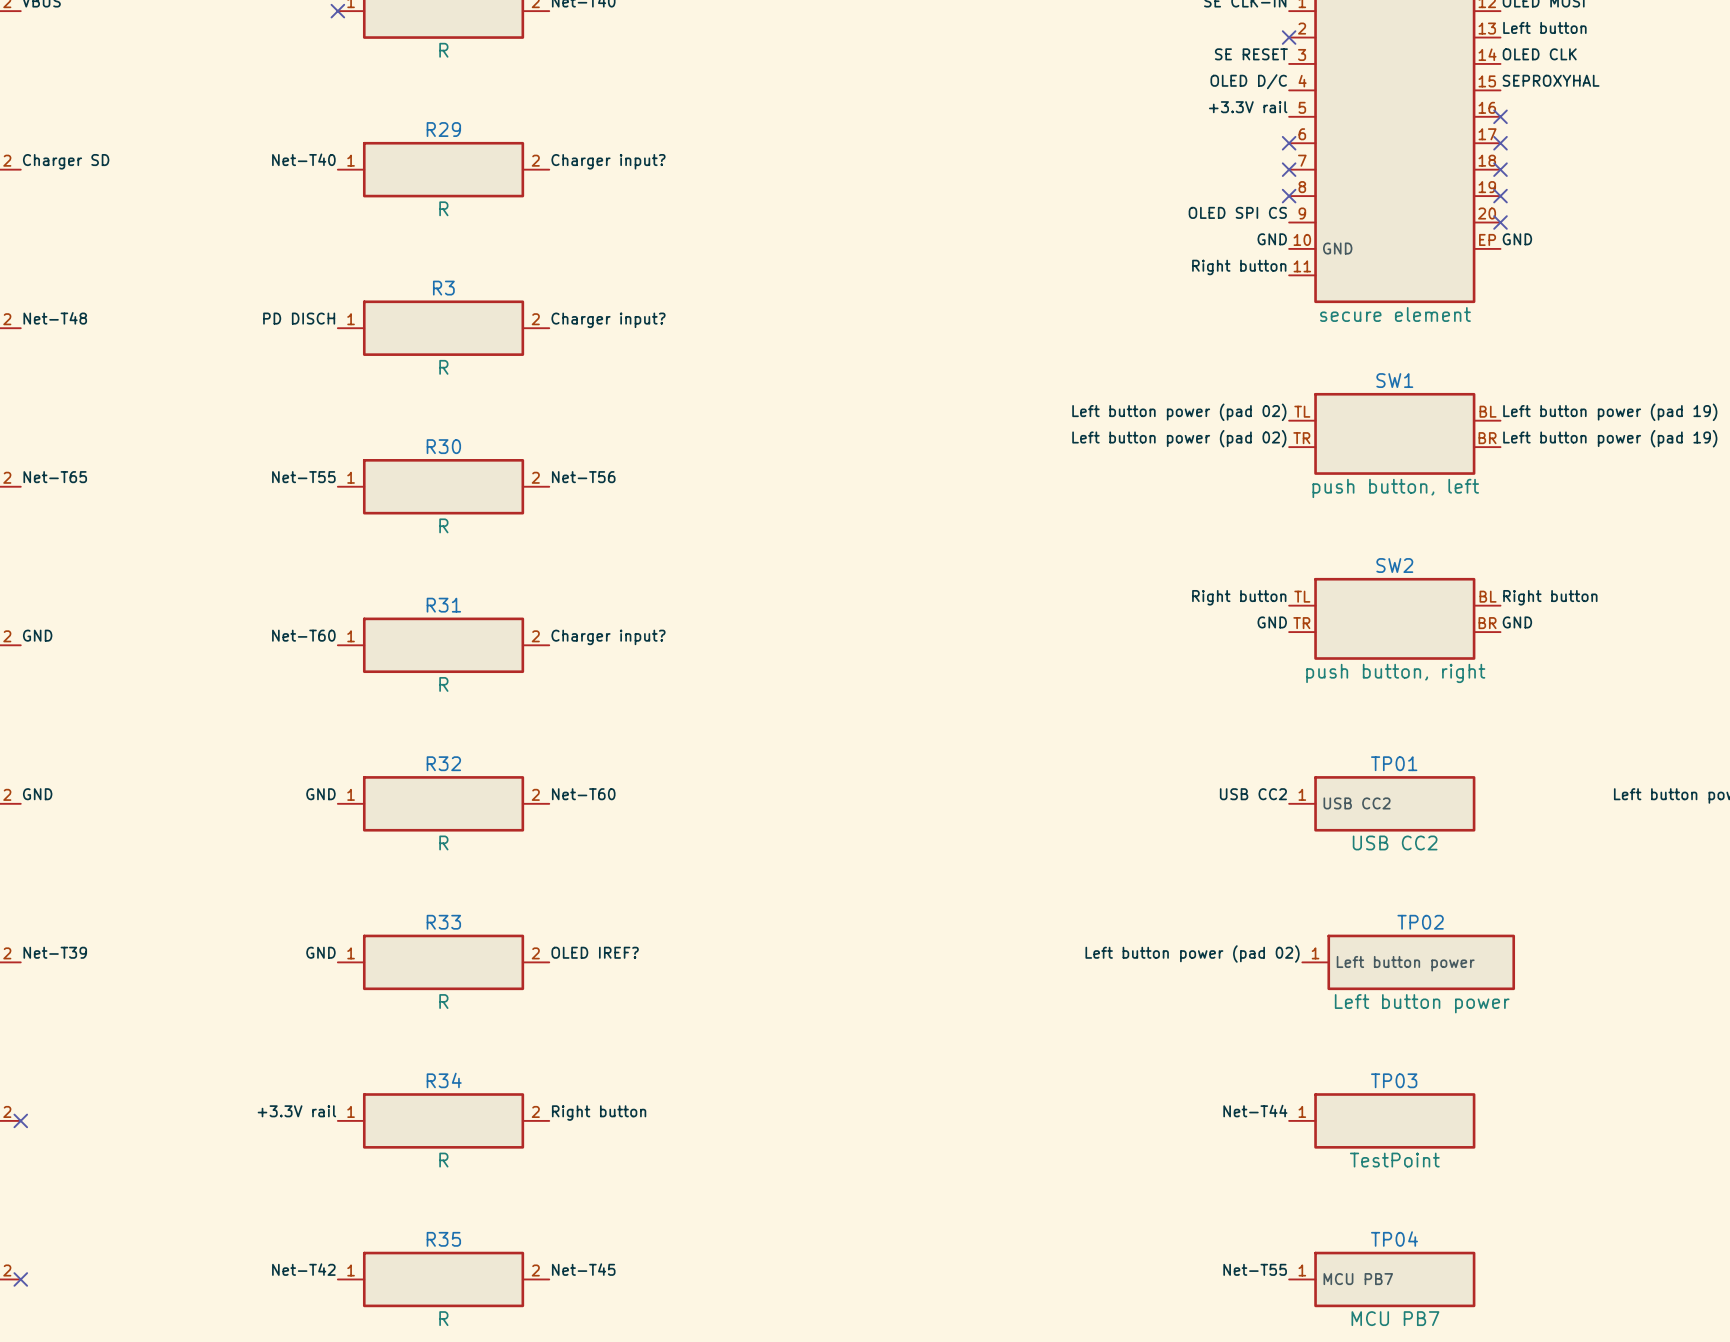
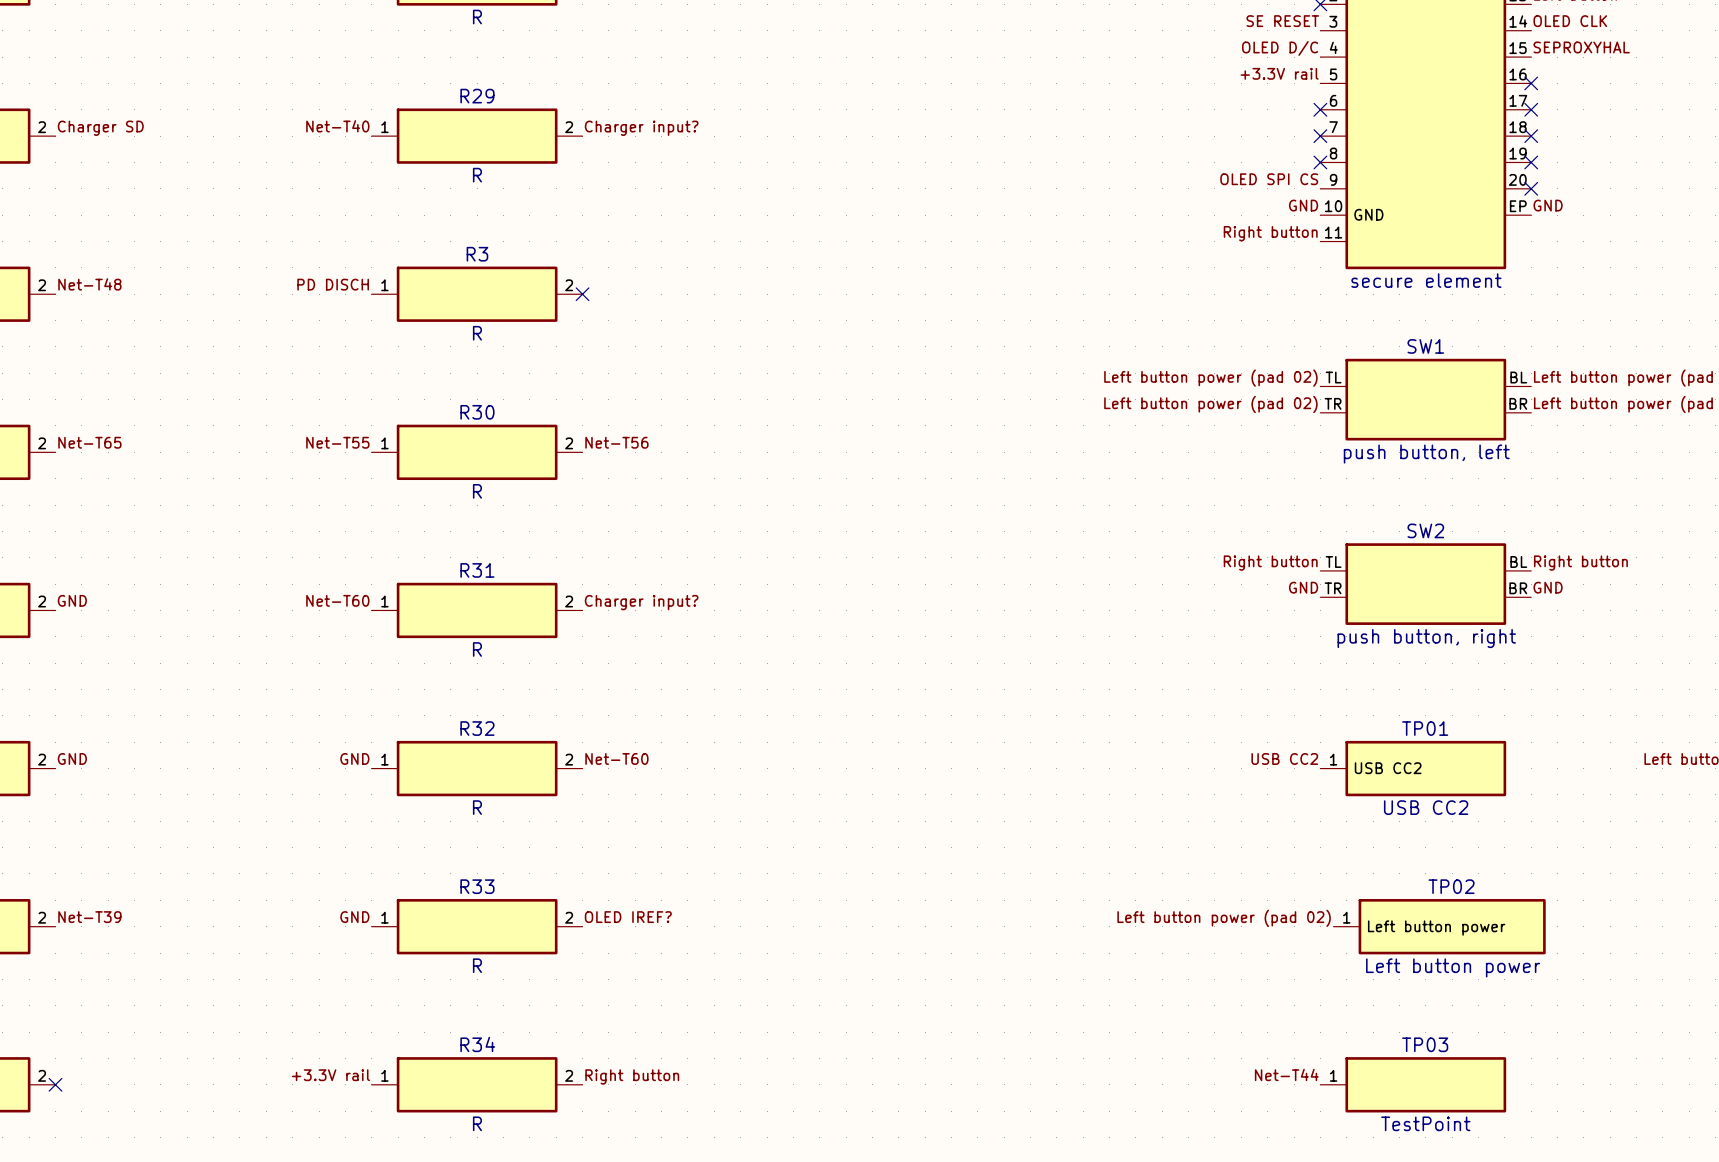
label: Charger input? (608, 320) -> none
no-connect mark: none -> (582, 294)

